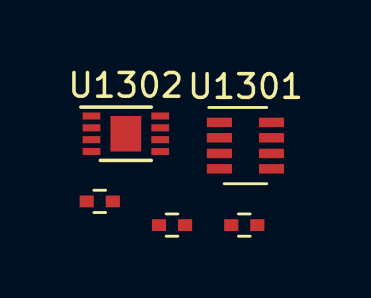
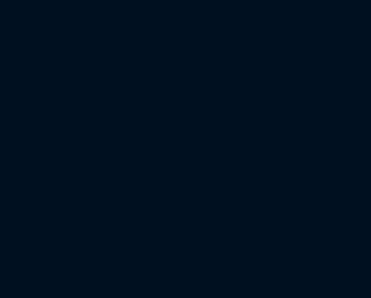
U1302: (124, 133) -> none
U1301: (245, 145) -> none
part: (99, 201) -> none
part: (172, 225) -> none
part: (244, 225) -> none

